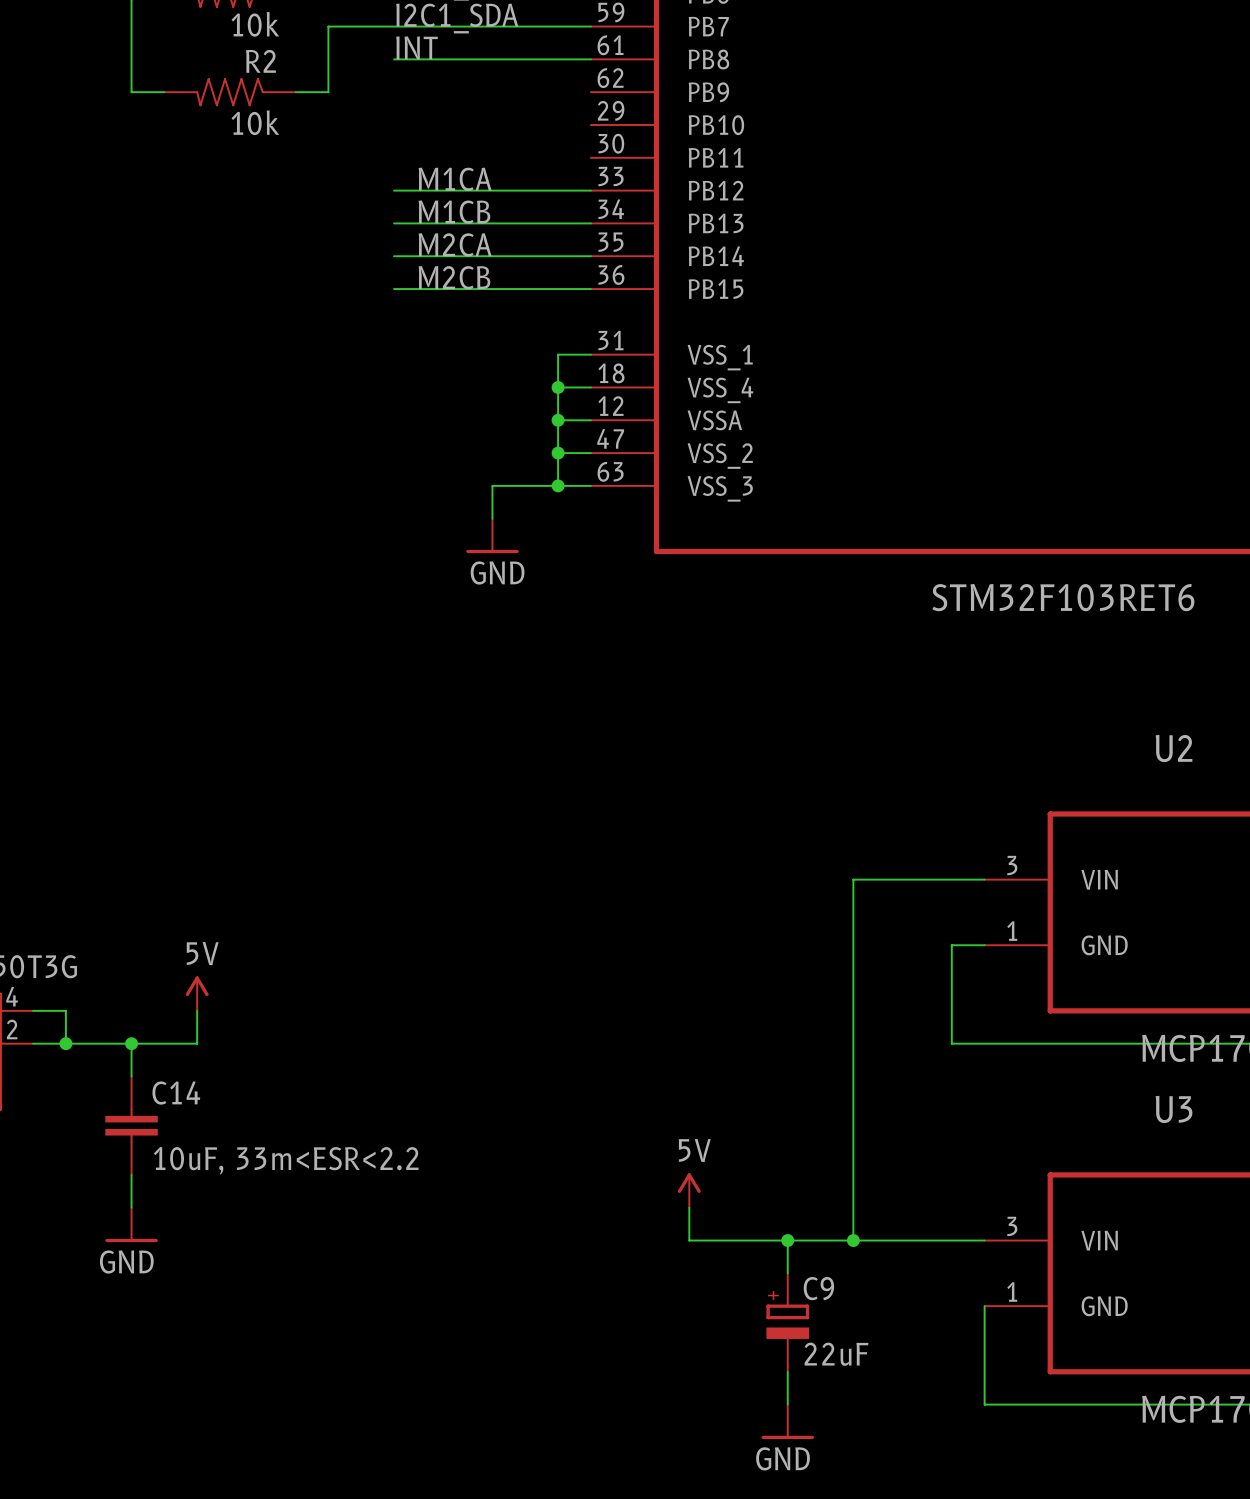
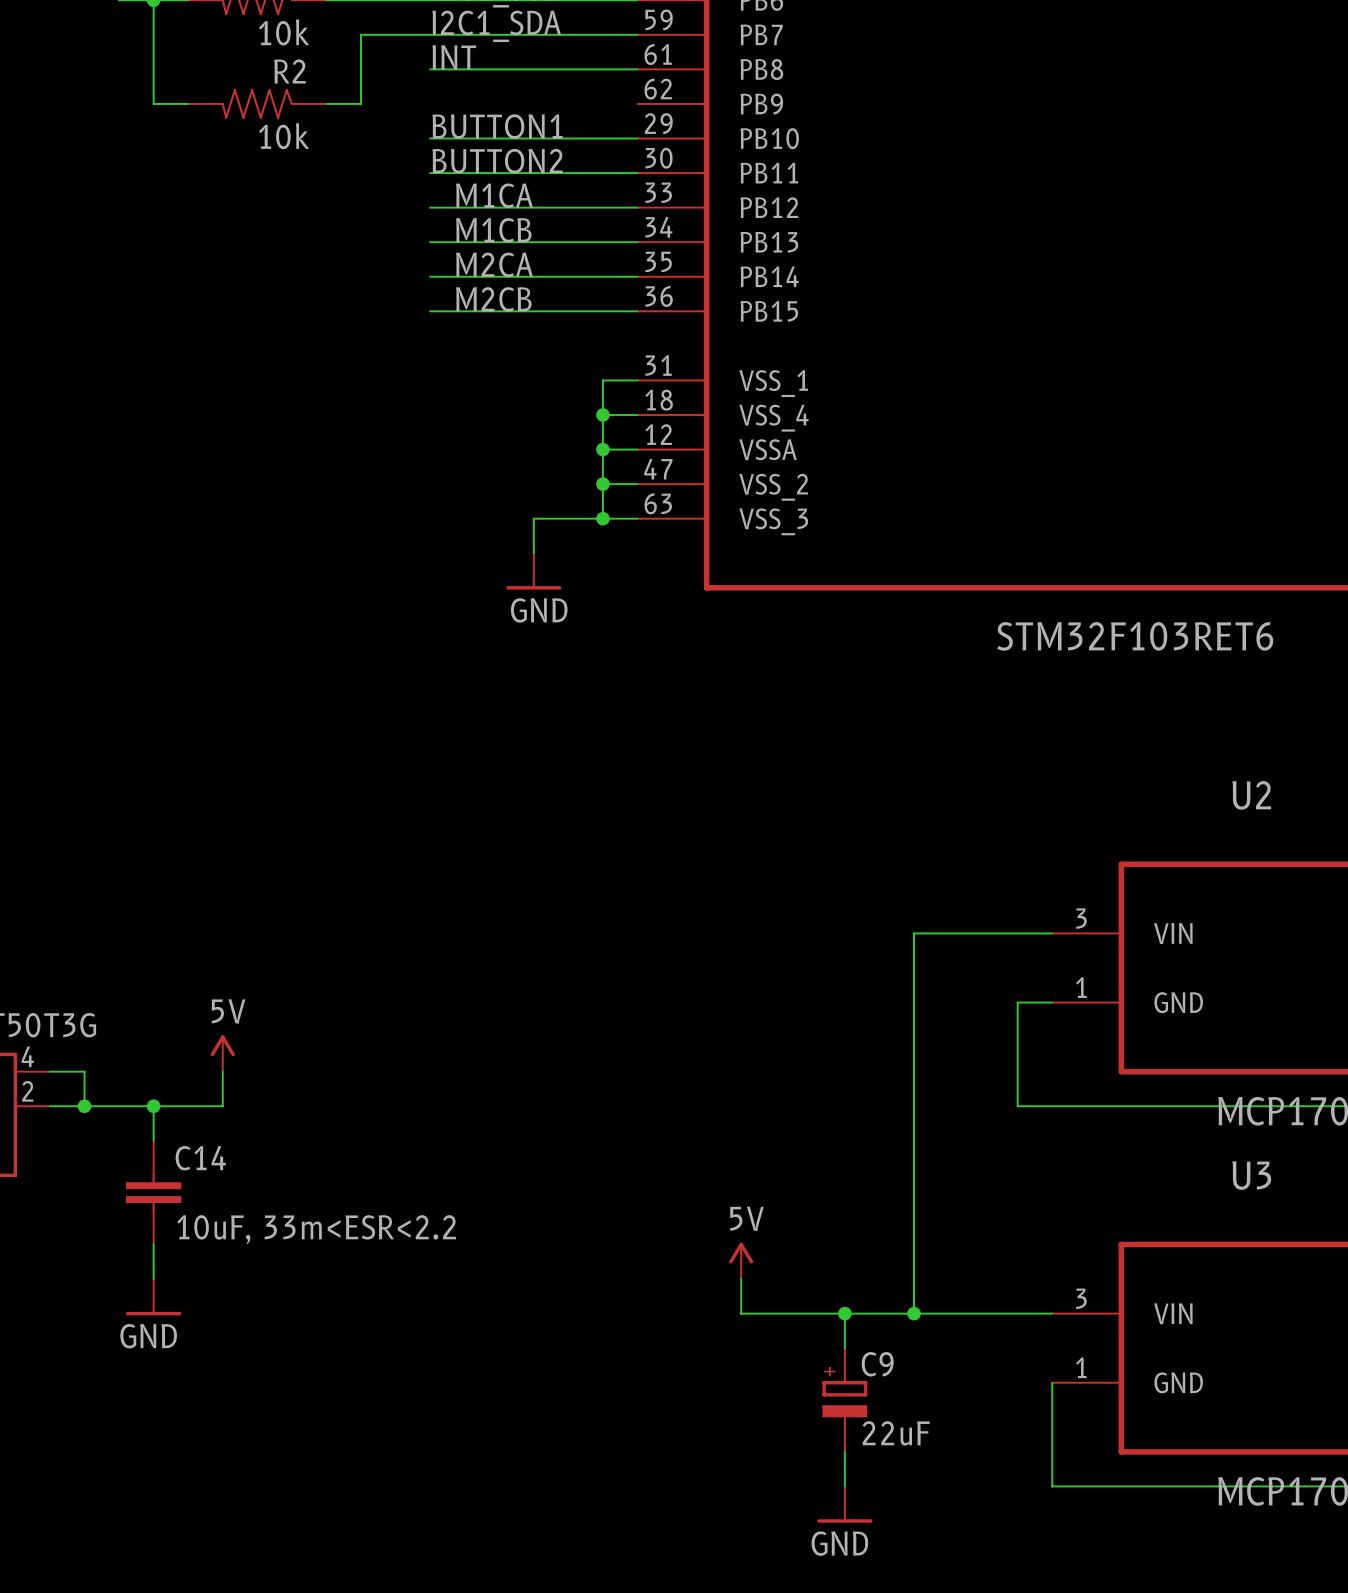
label: none -> BUTTON1 (497, 126)
wire: none -> (430, 138) (637, 138)
label: none -> BUTTON2 (497, 161)
wire: none -> (430, 173) (637, 173)

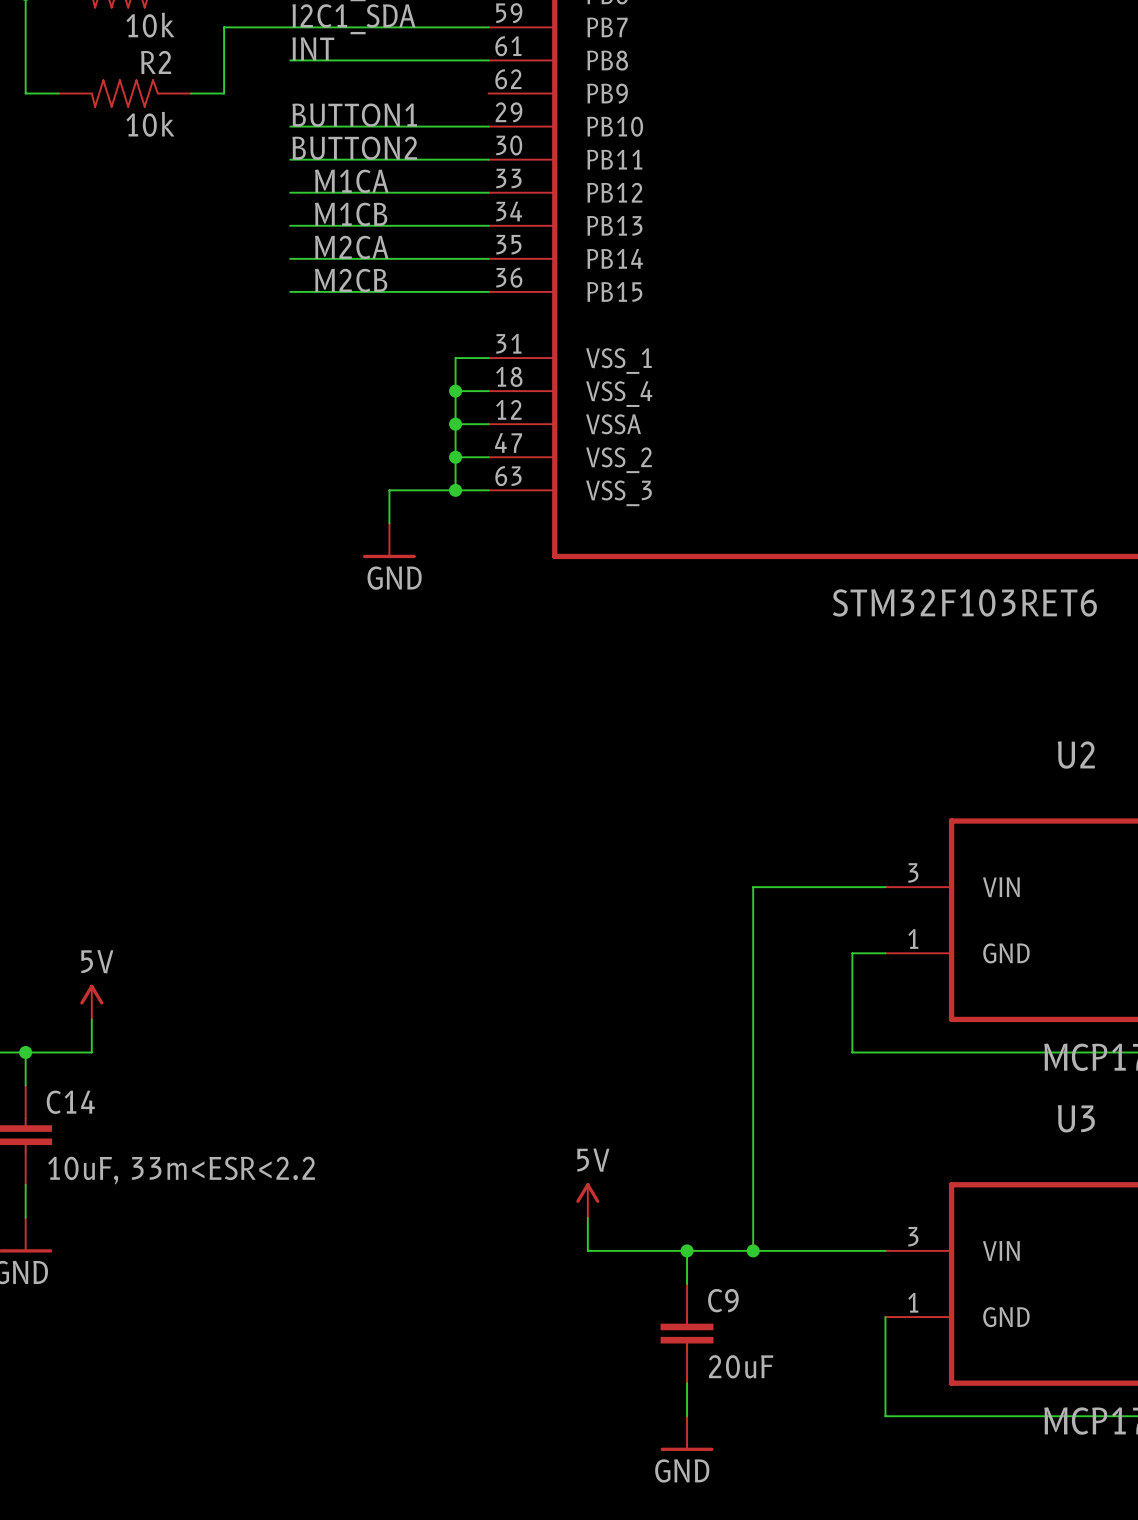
C9 symbol: [822, 1348, 868, 1452] -> [660, 1283, 714, 1384]
C9 value: 22uF (896, 1433) -> 20uF (741, 1366)

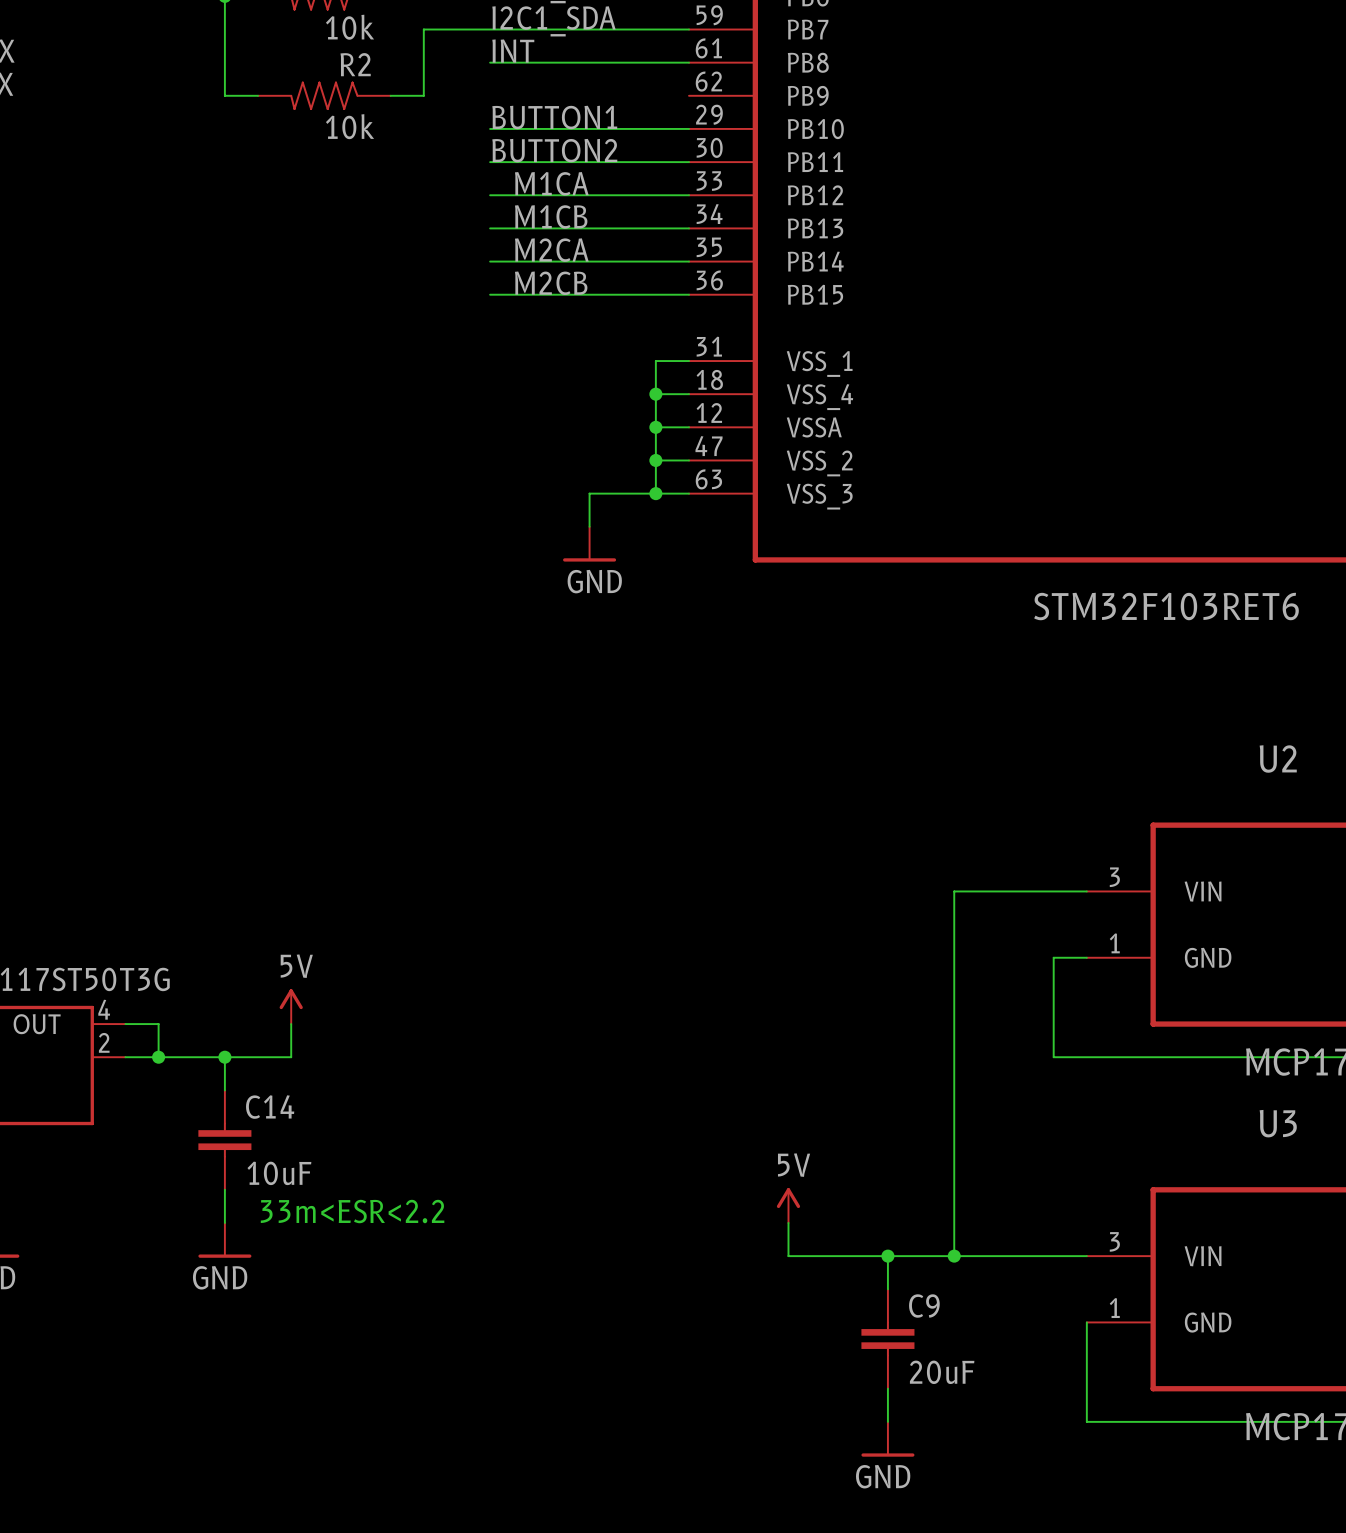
C14 value: 10uF, 33m<ESR<2.2 (181, 1170) -> 10uF (279, 1173)
text: none -> 33m<ESR<2.2 (352, 1211)

